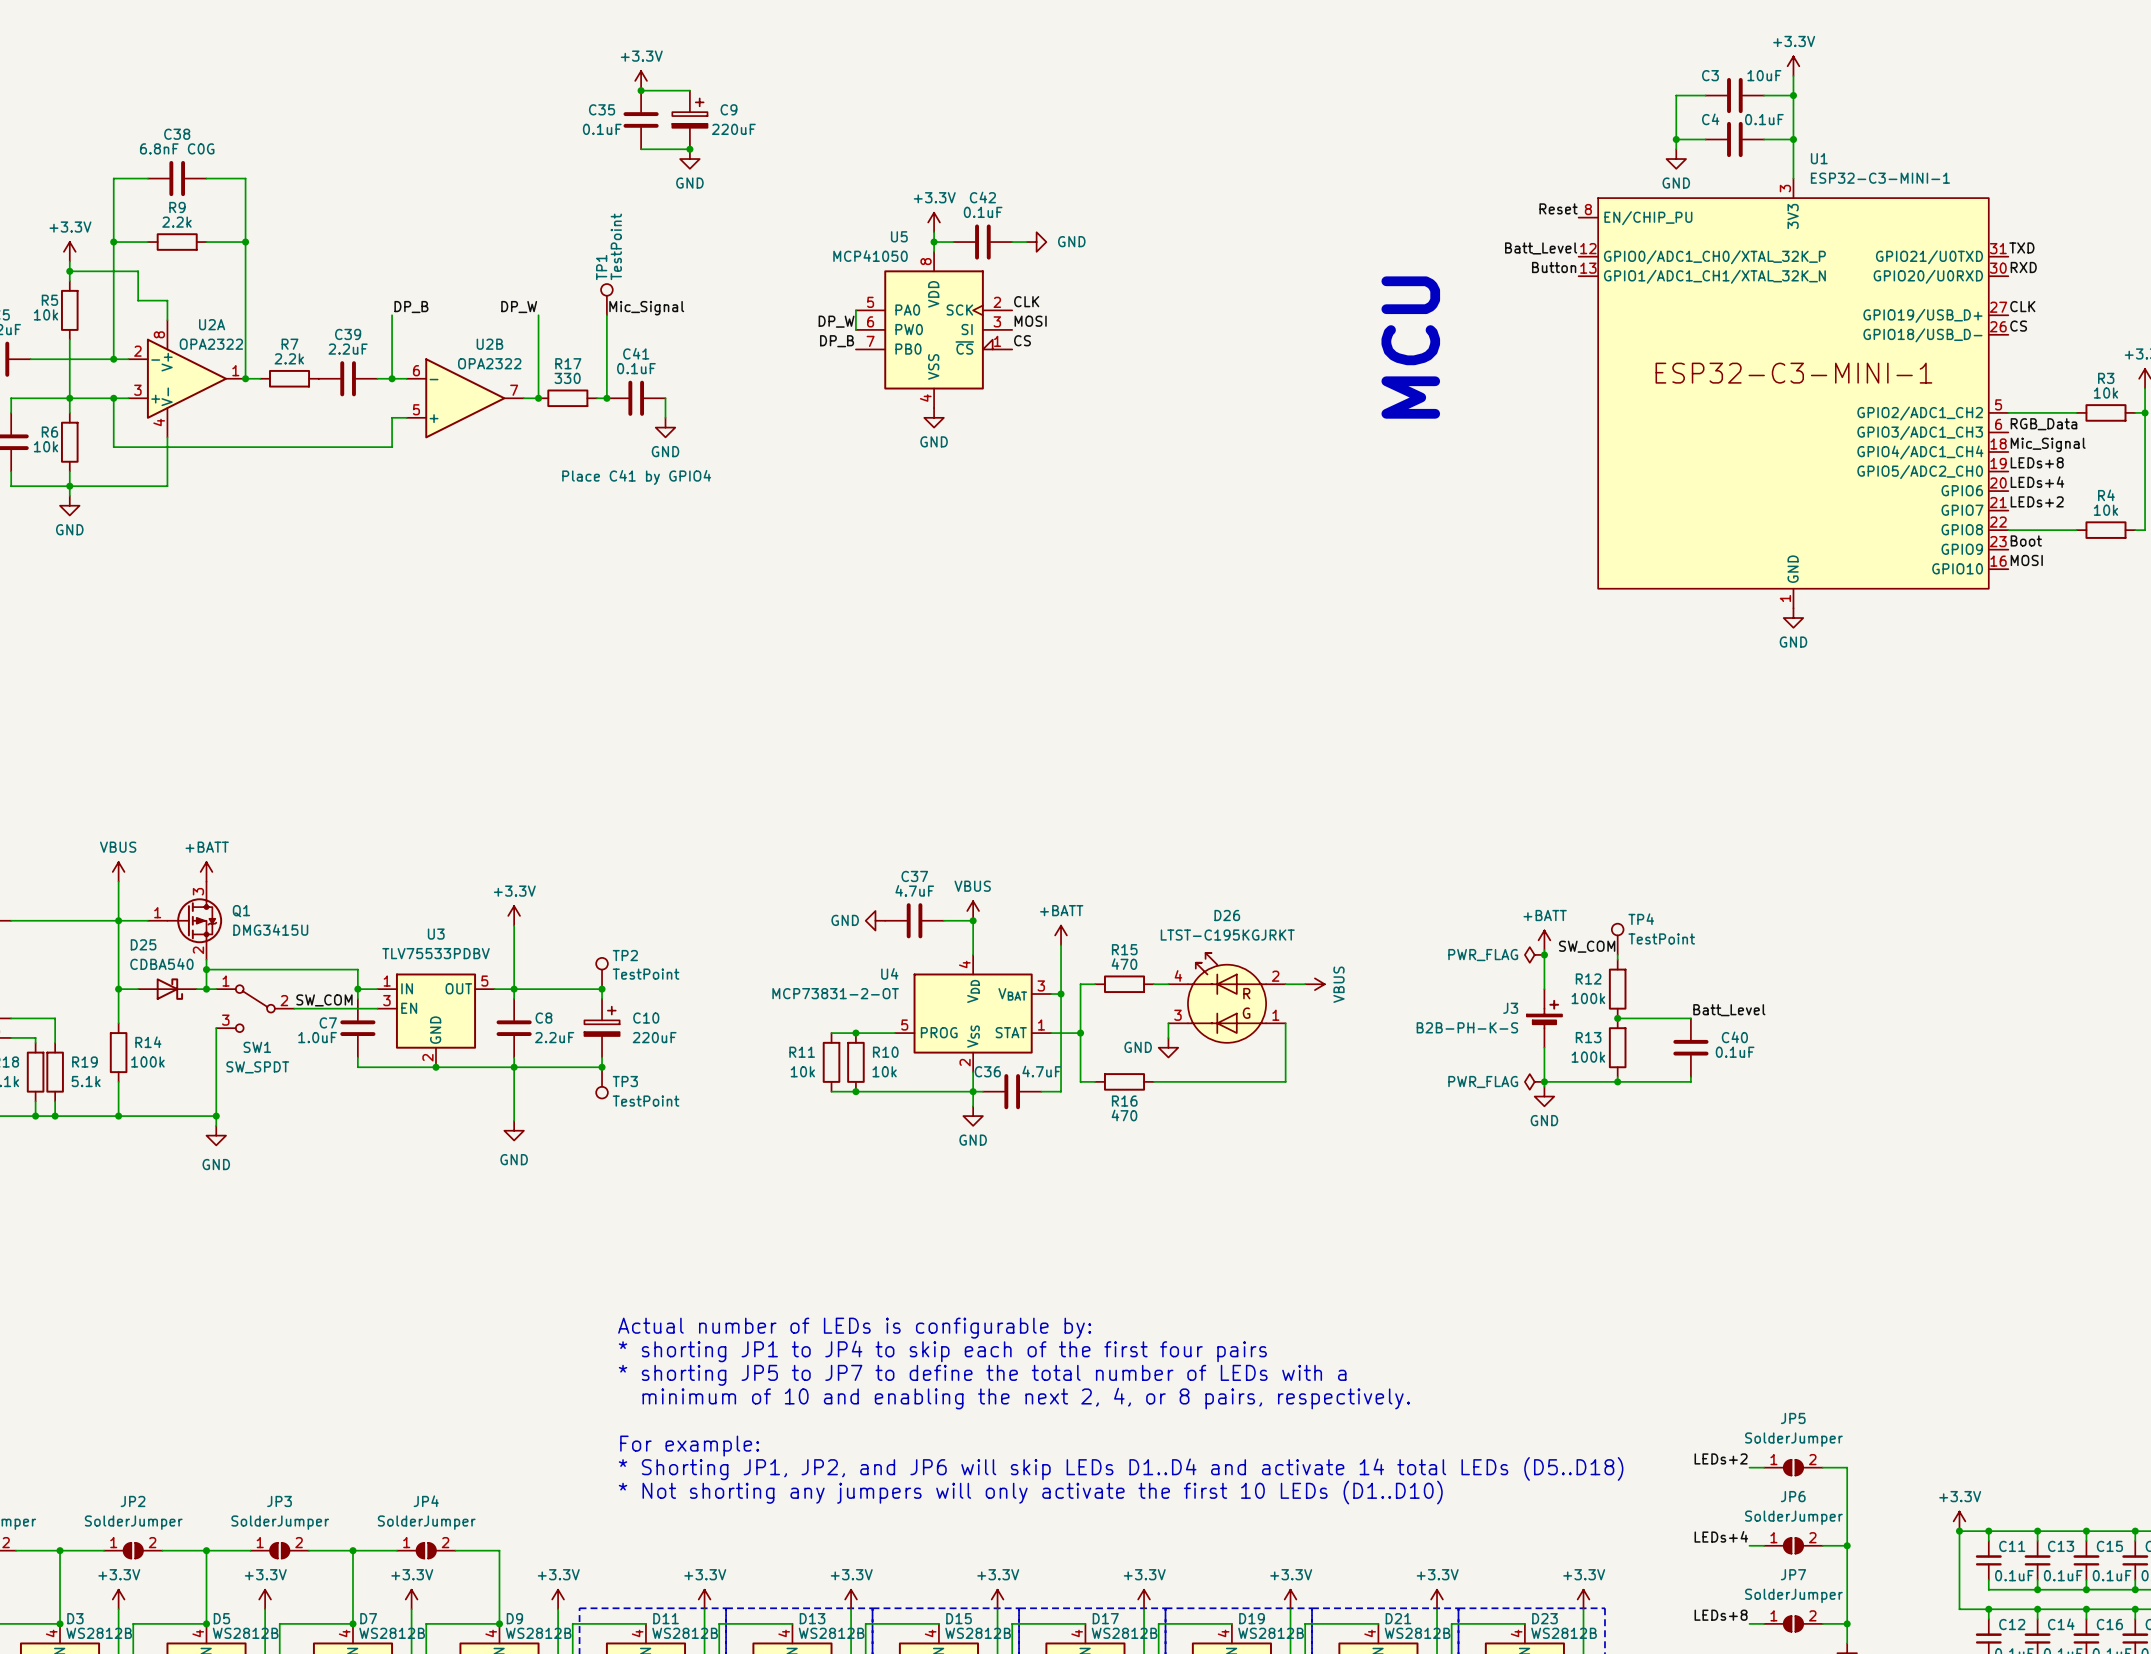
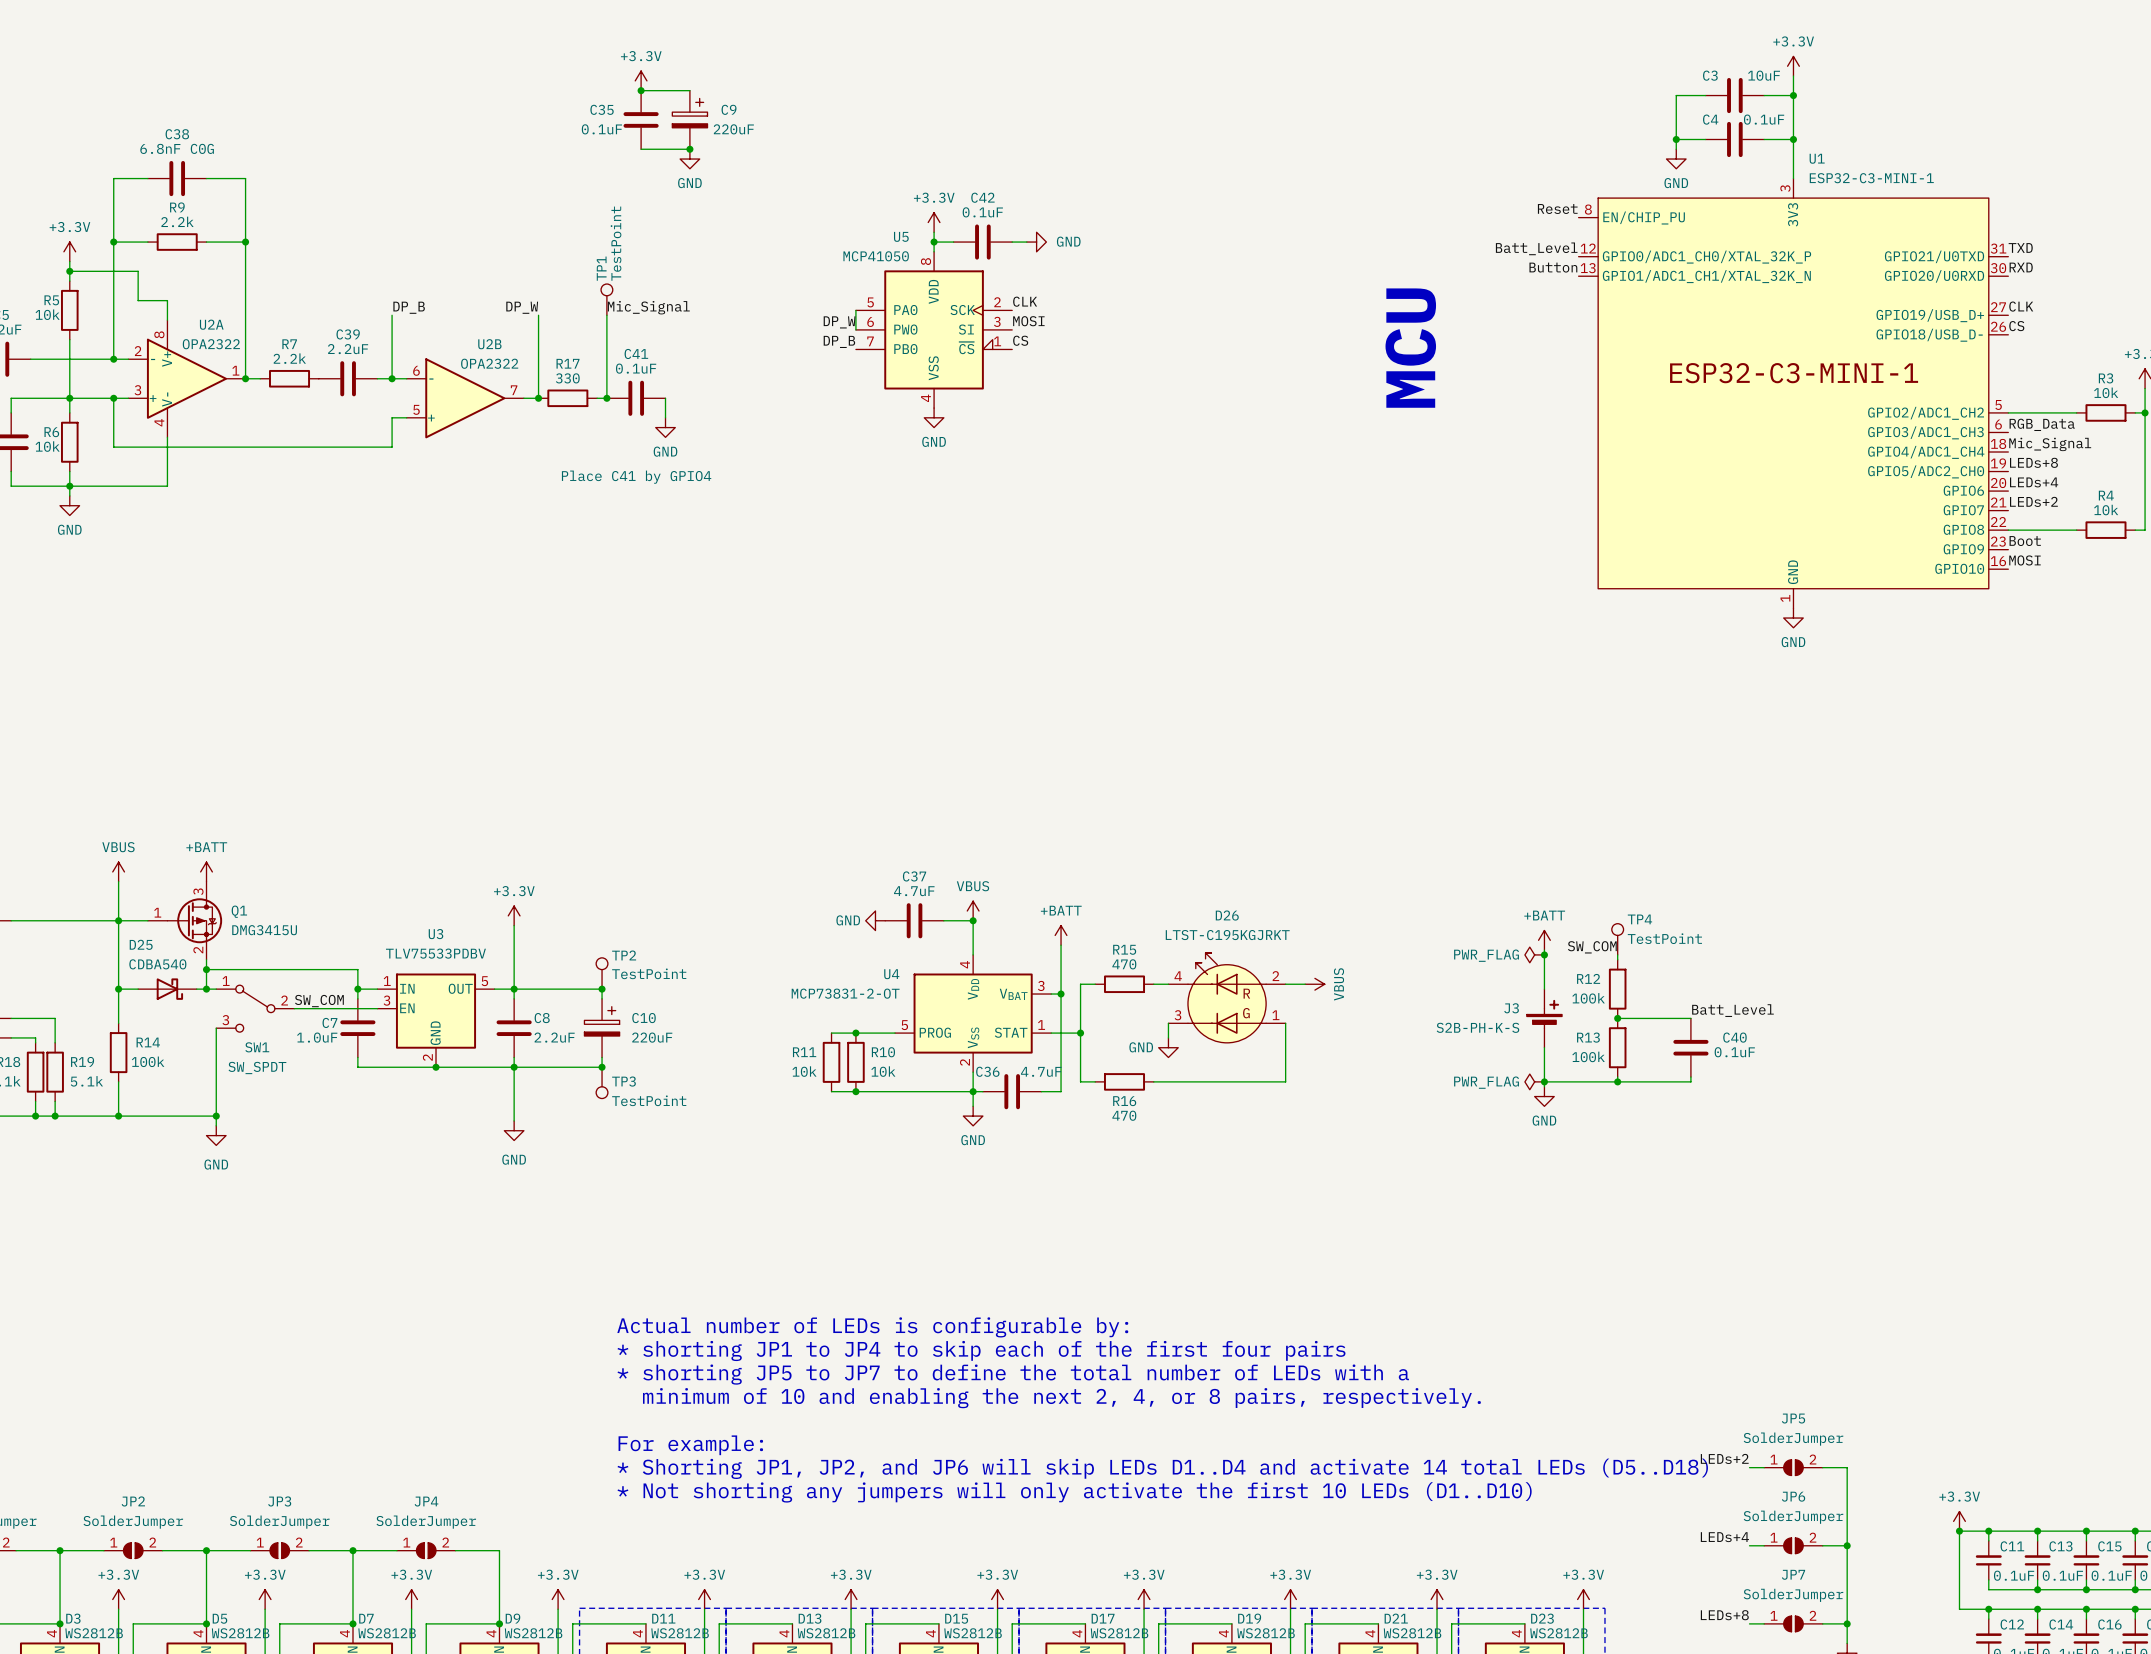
J3 value: B2B-PH-K-S (1467, 1027) -> S2B-PH-K-S (1477, 1027)

